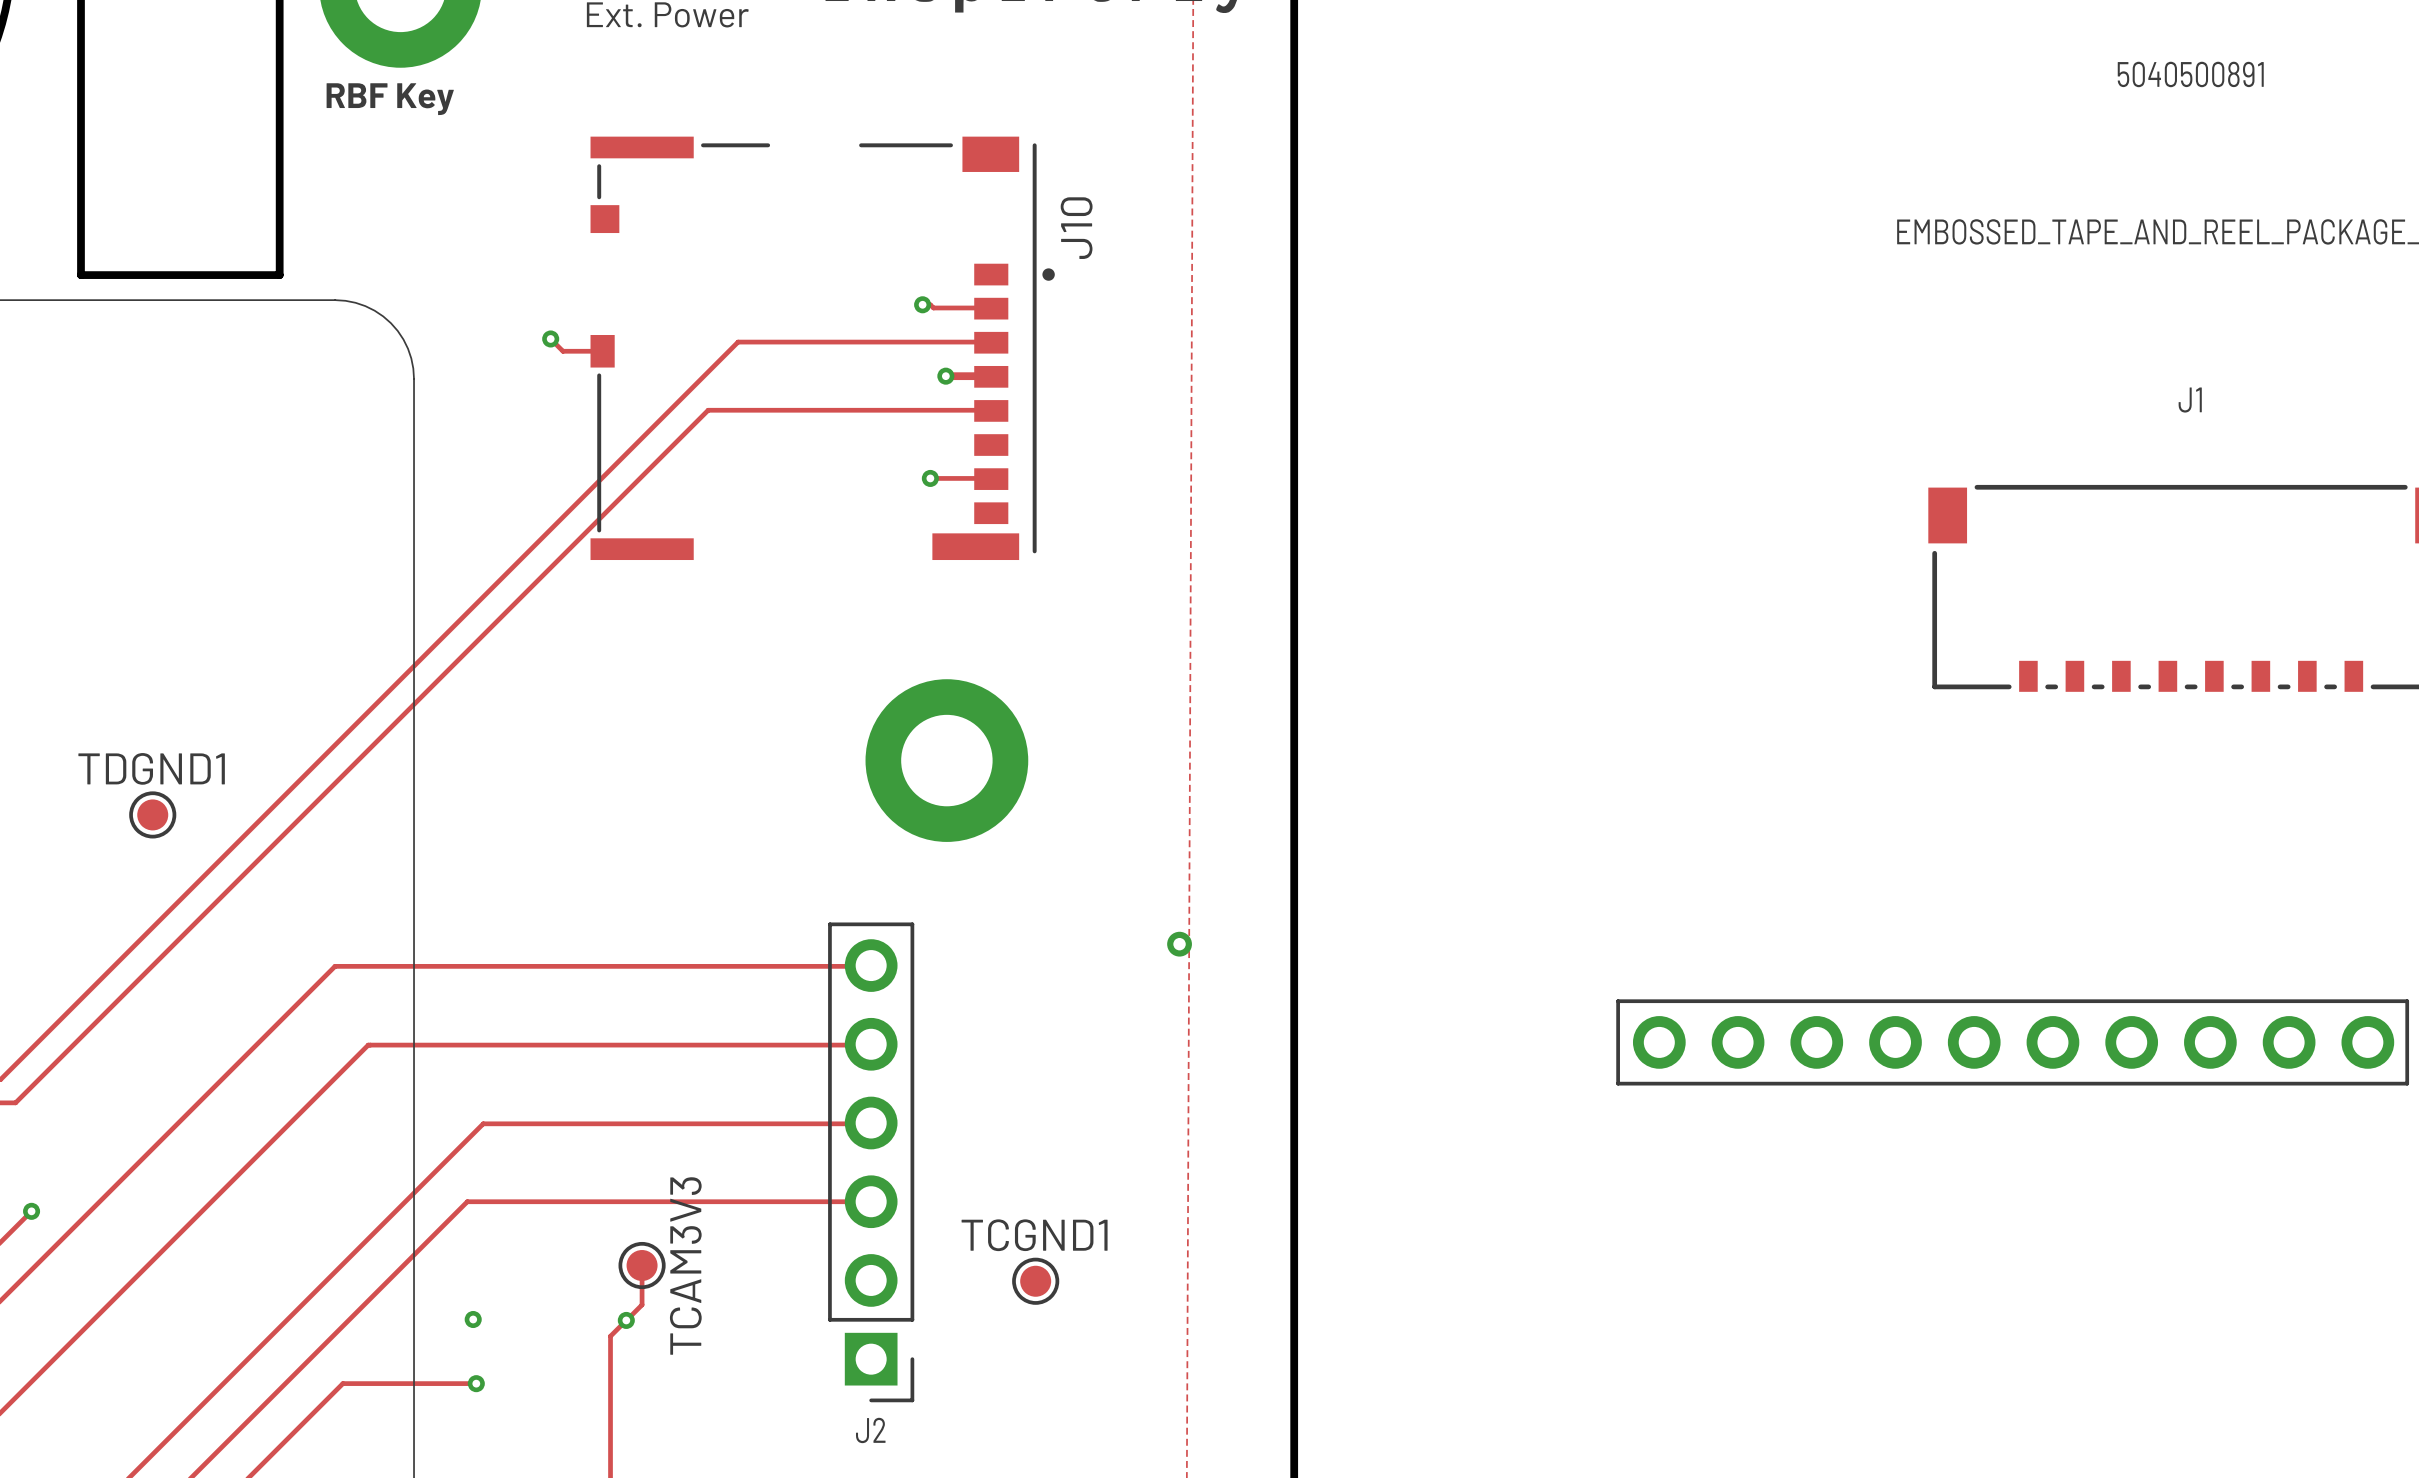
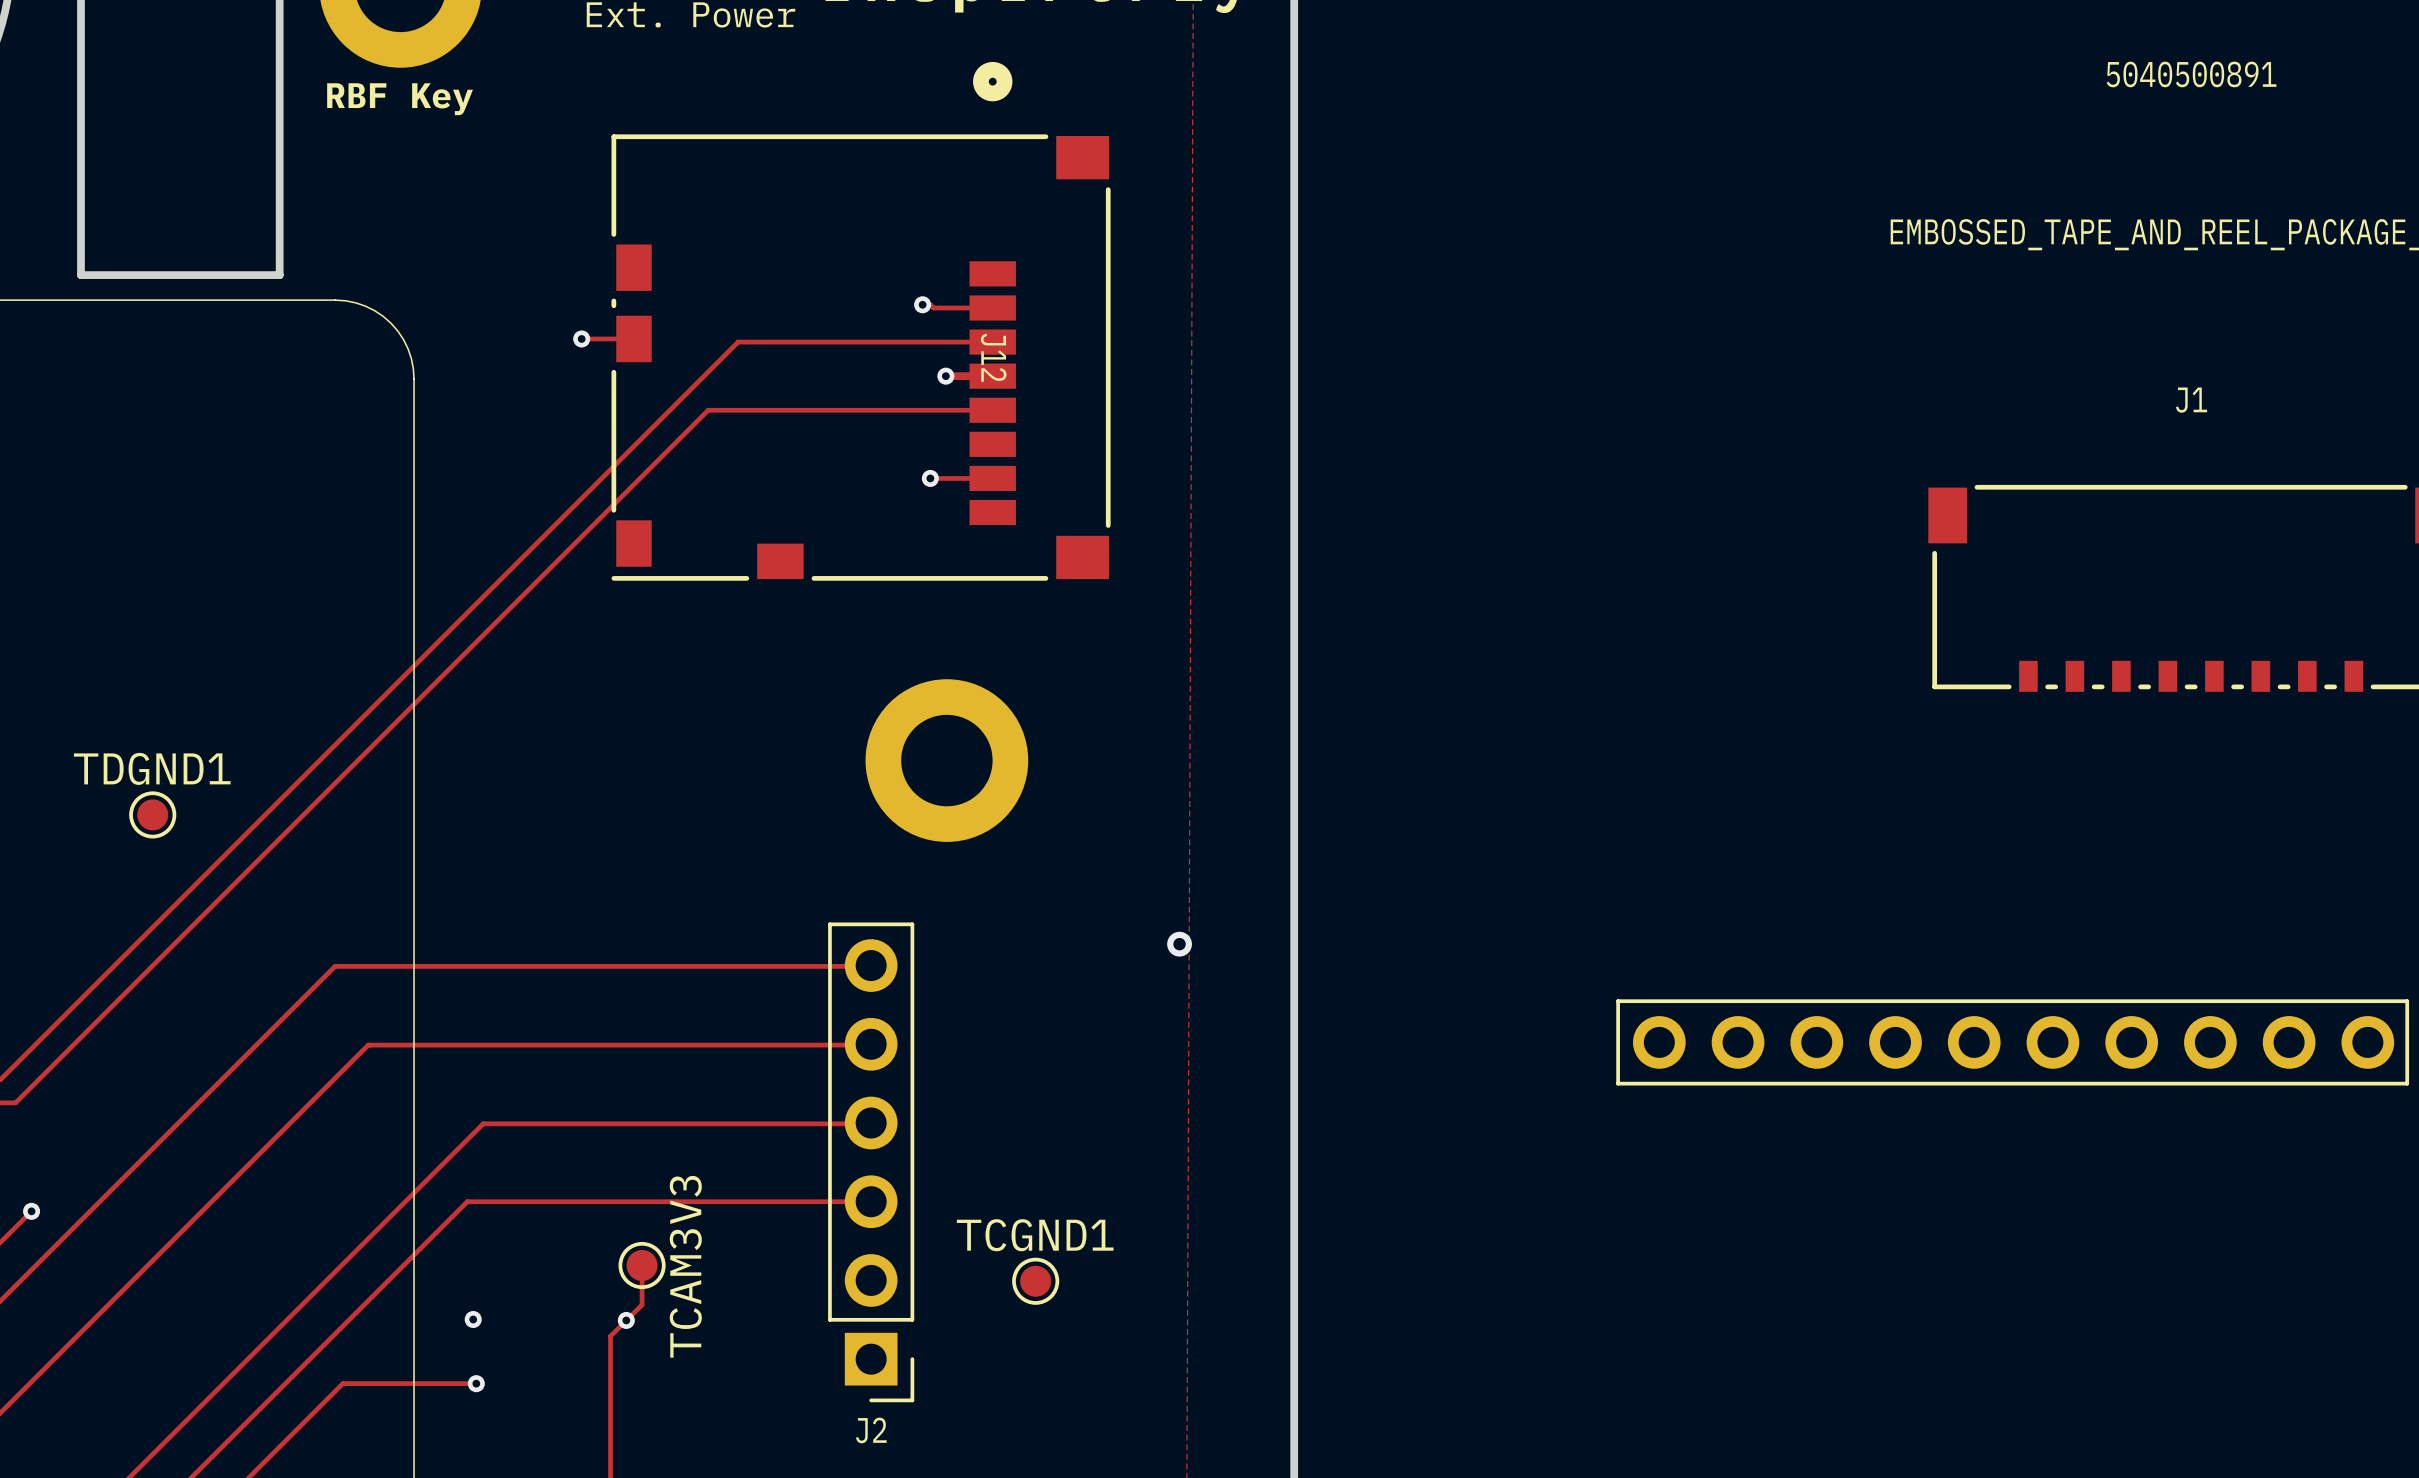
J12: none -> (861, 321)
track: (550, 338) (562, 351) (602, 351) -> none
via position: (550, 338) -> (581, 338)
track: none -> (581, 338) (633, 338)
J10: (822, 348) -> none

